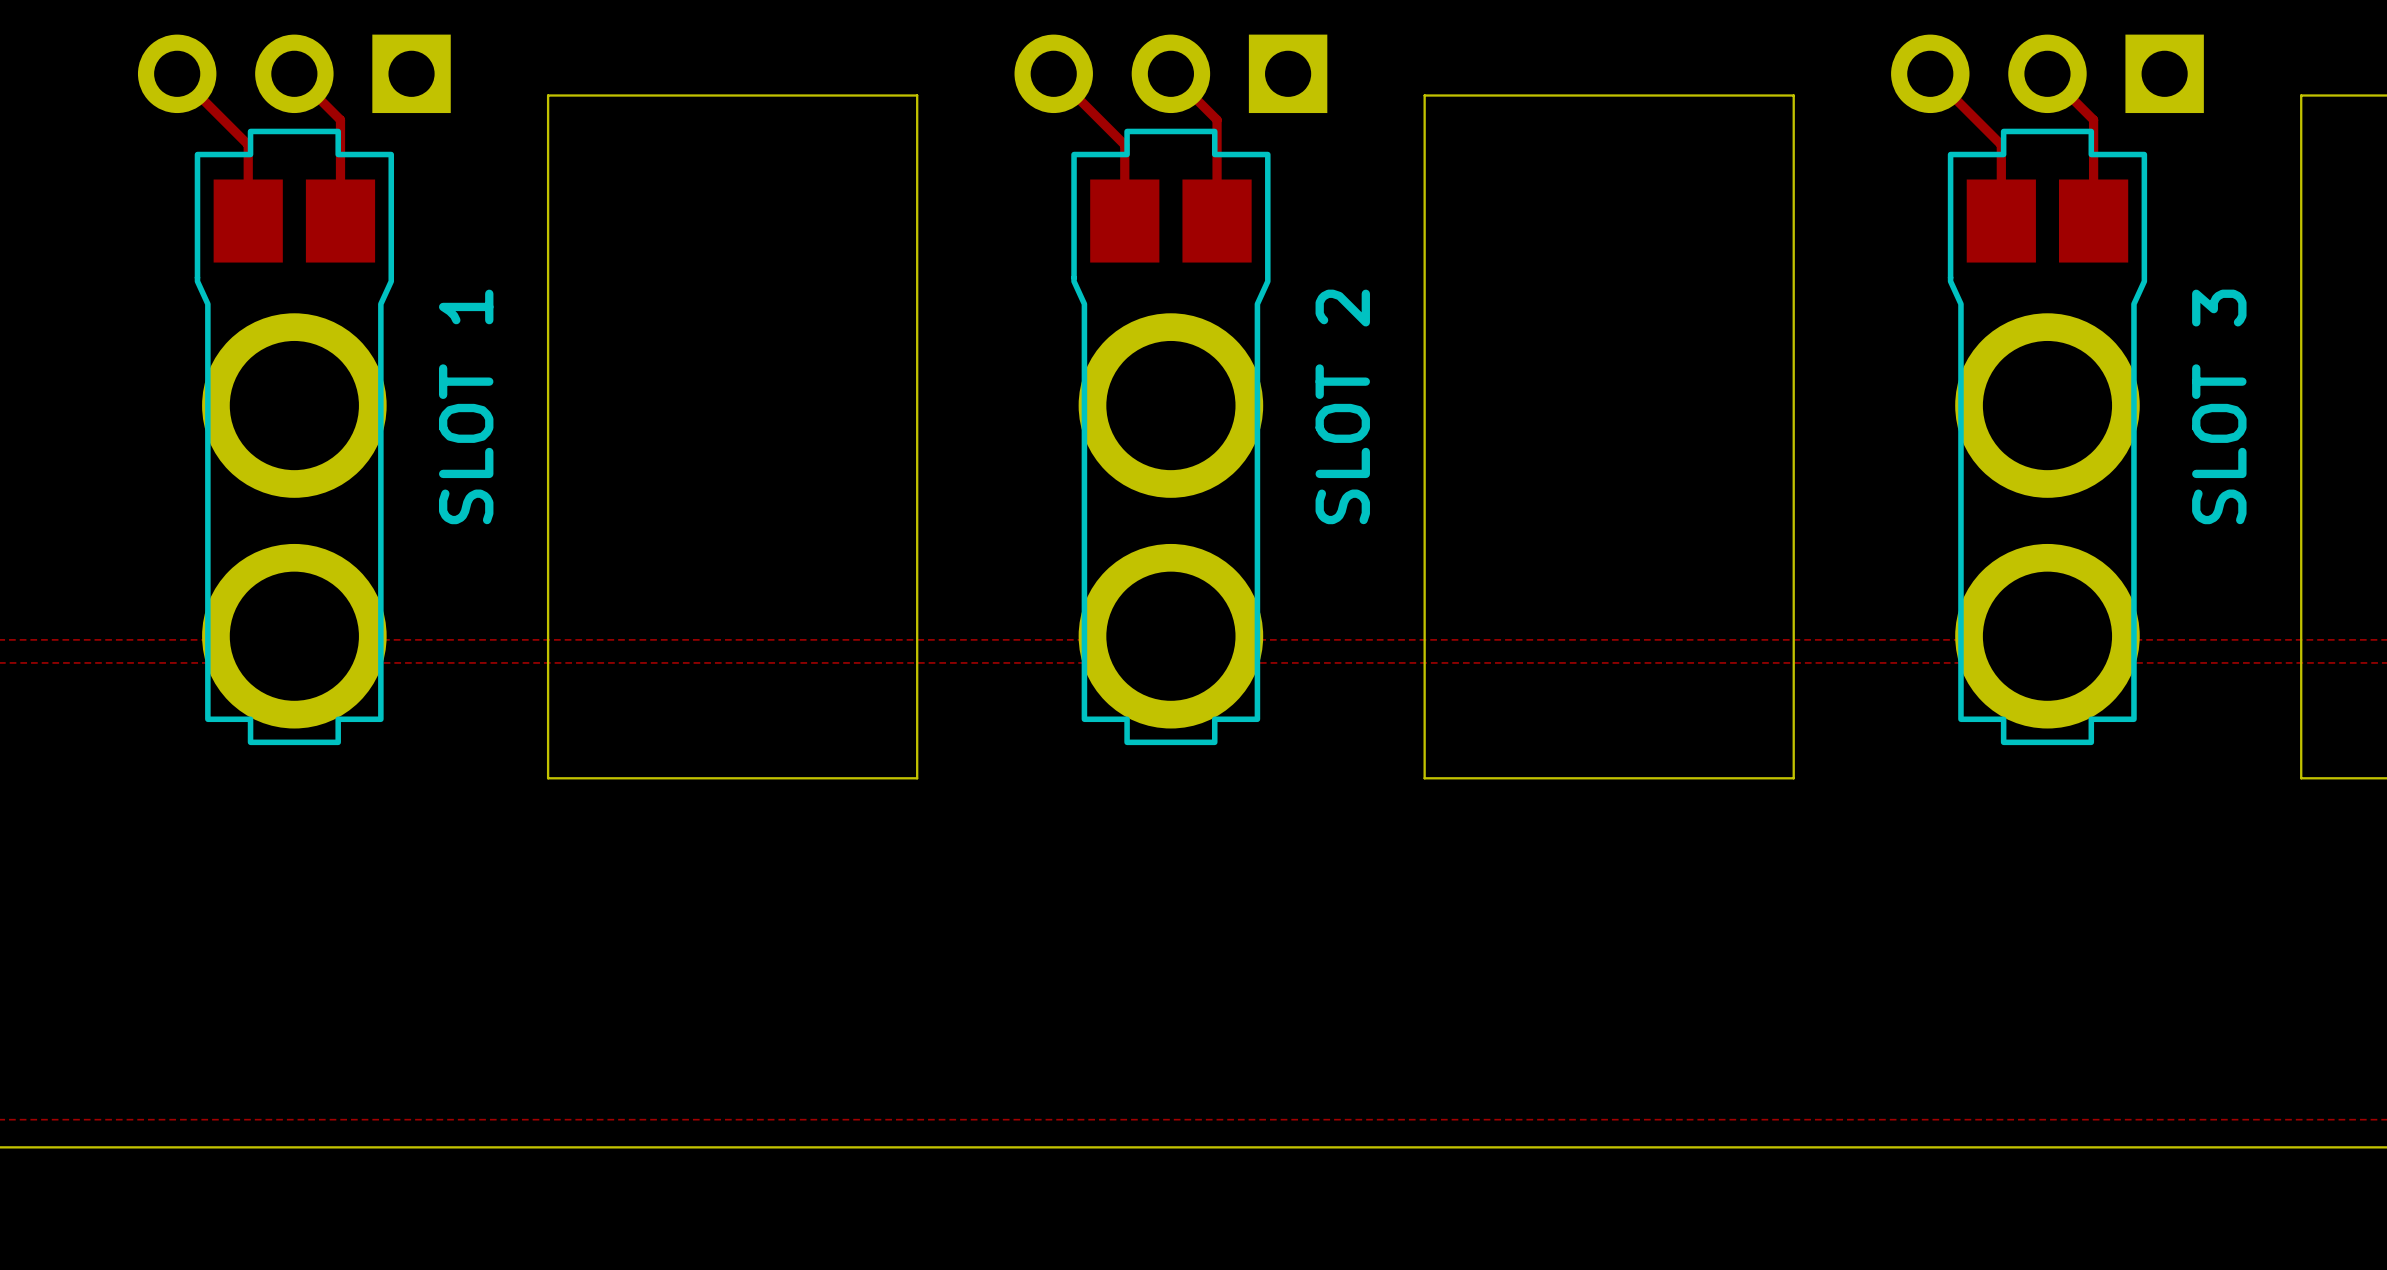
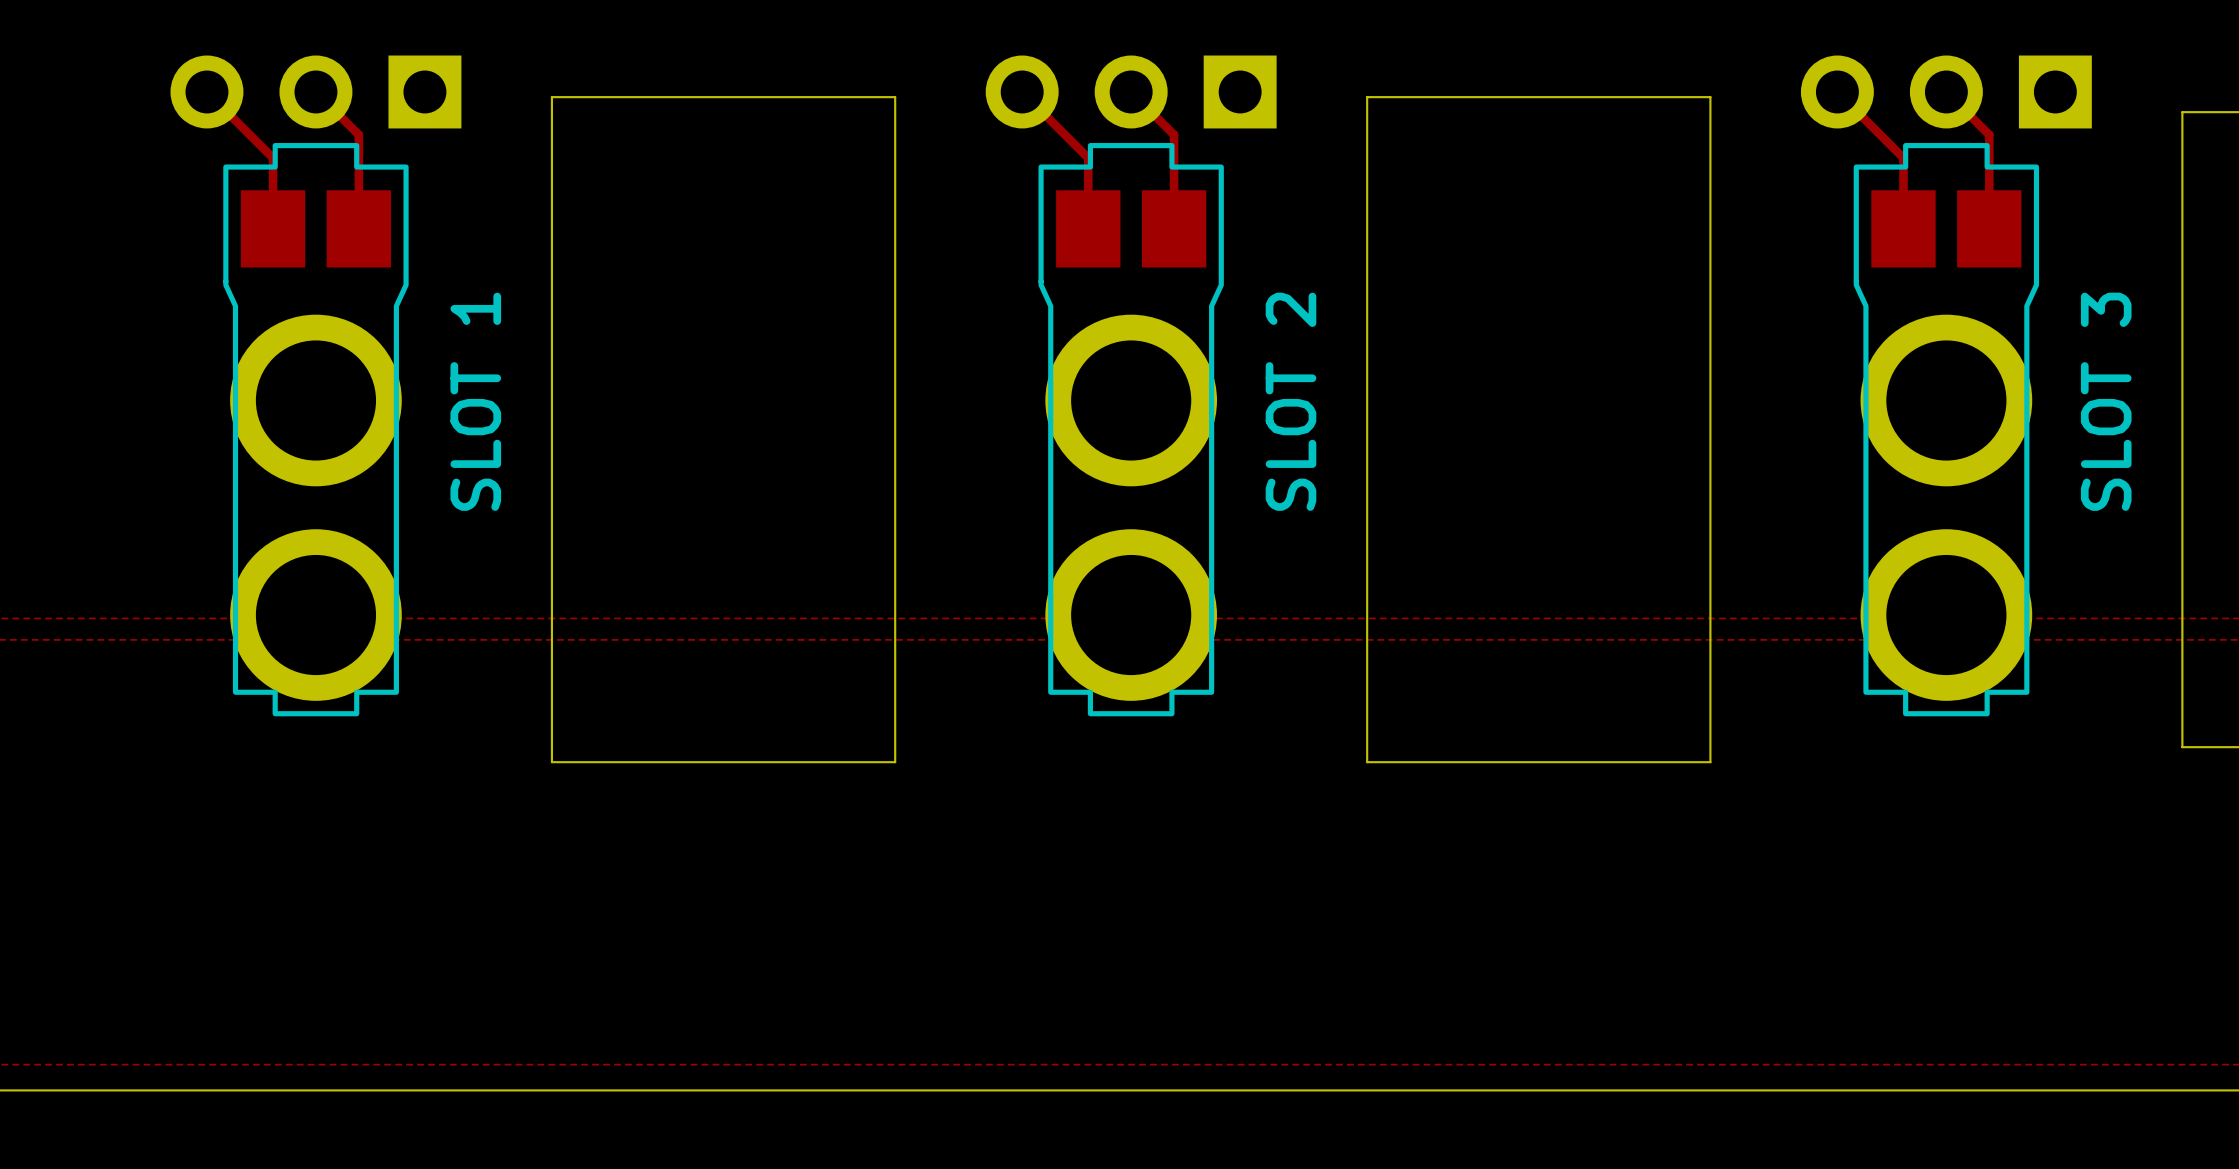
board edge: (548, 95) (917, 95) -> (551, 112) (551, 97) (895, 97) (895, 112)
board edge: (1424, 95) (1793, 95) -> (1367, 112) (1367, 97) (1710, 97) (1710, 112)
board edge: (548, 778) (917, 778) -> (551, 747) (551, 762) (895, 762) (895, 747)
board edge: (1424, 778) (1793, 778) -> (1367, 747) (1367, 762) (1710, 762) (1710, 747)

